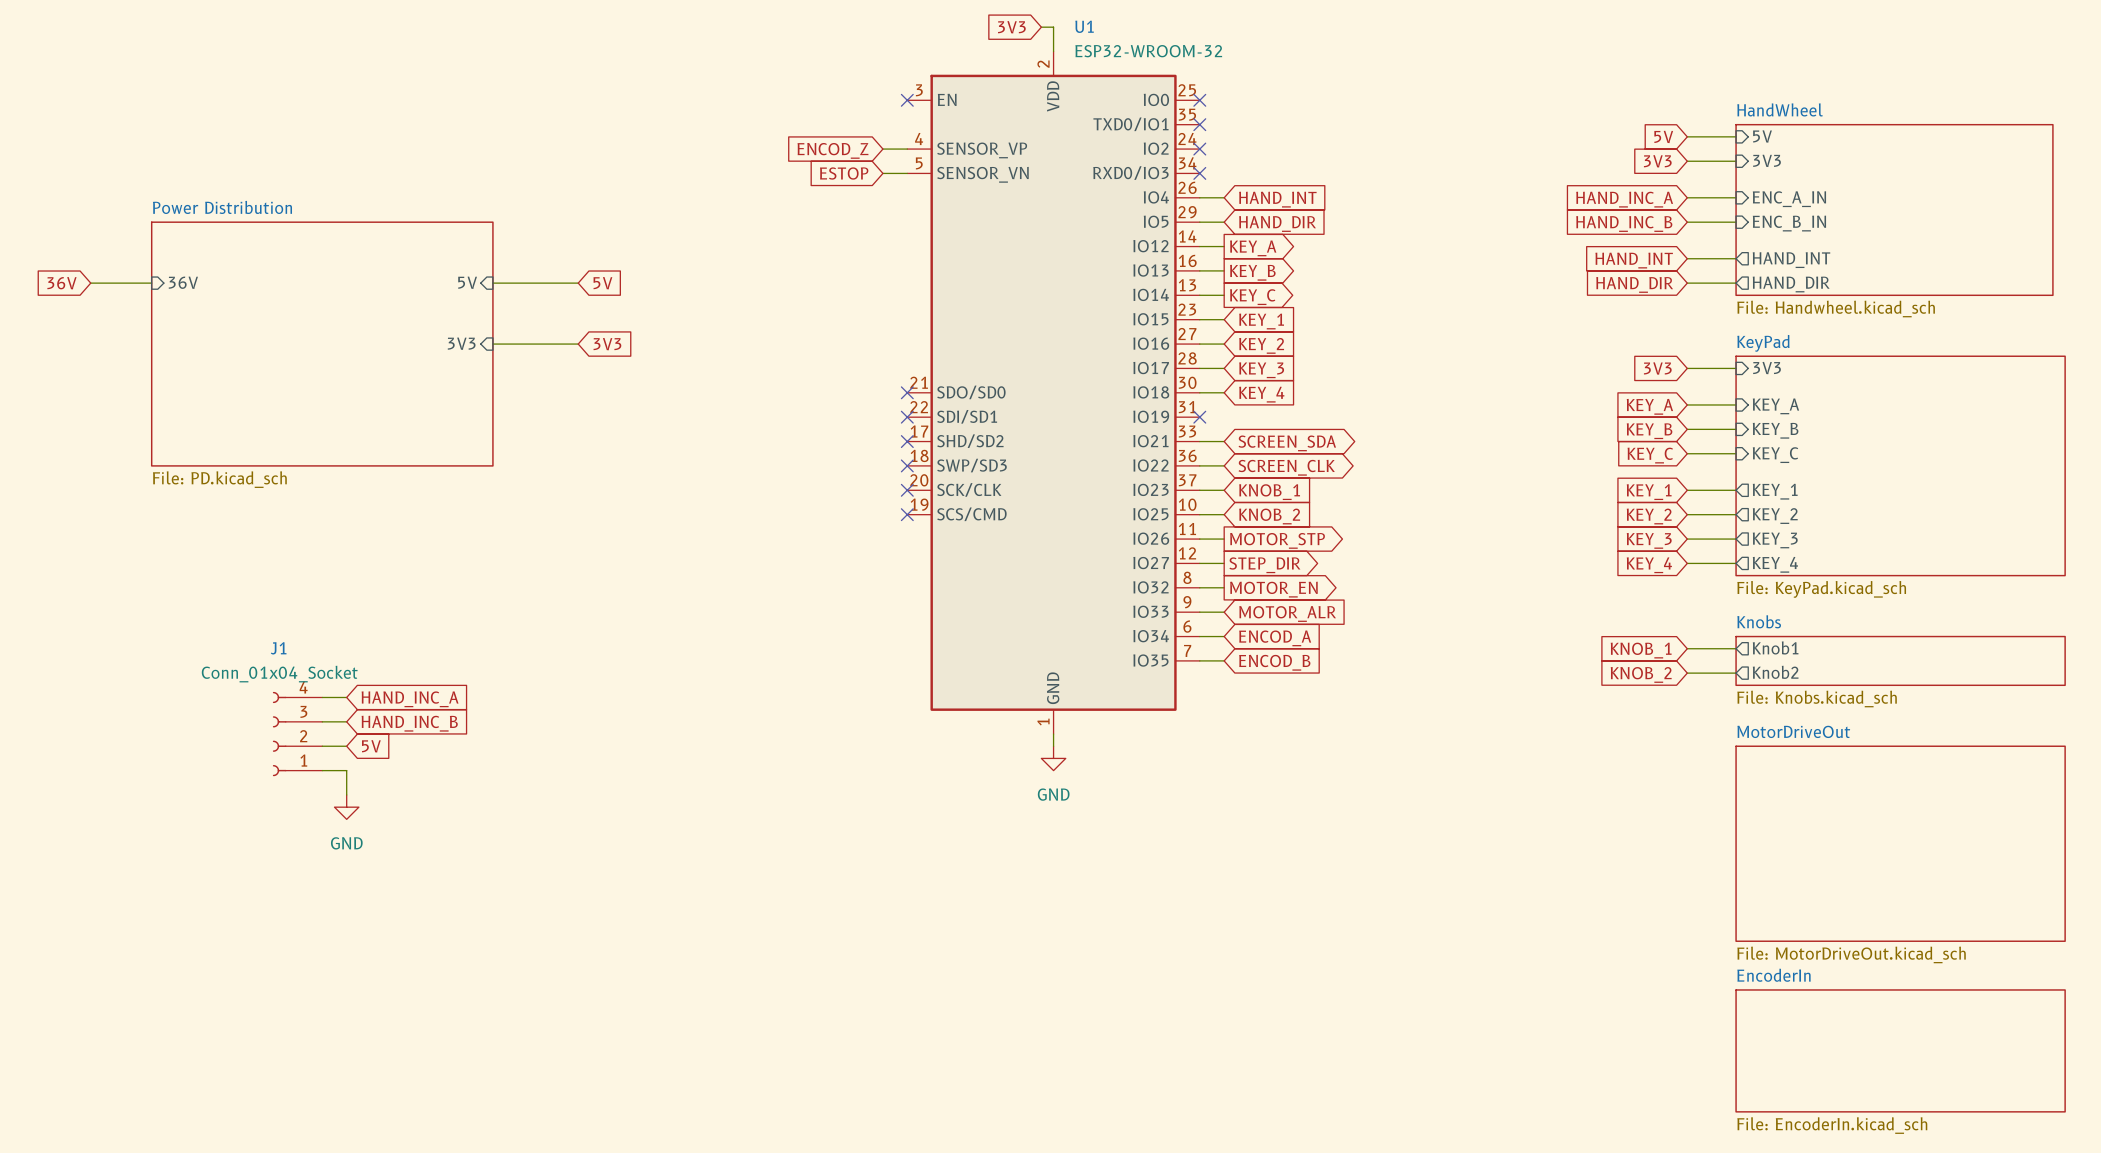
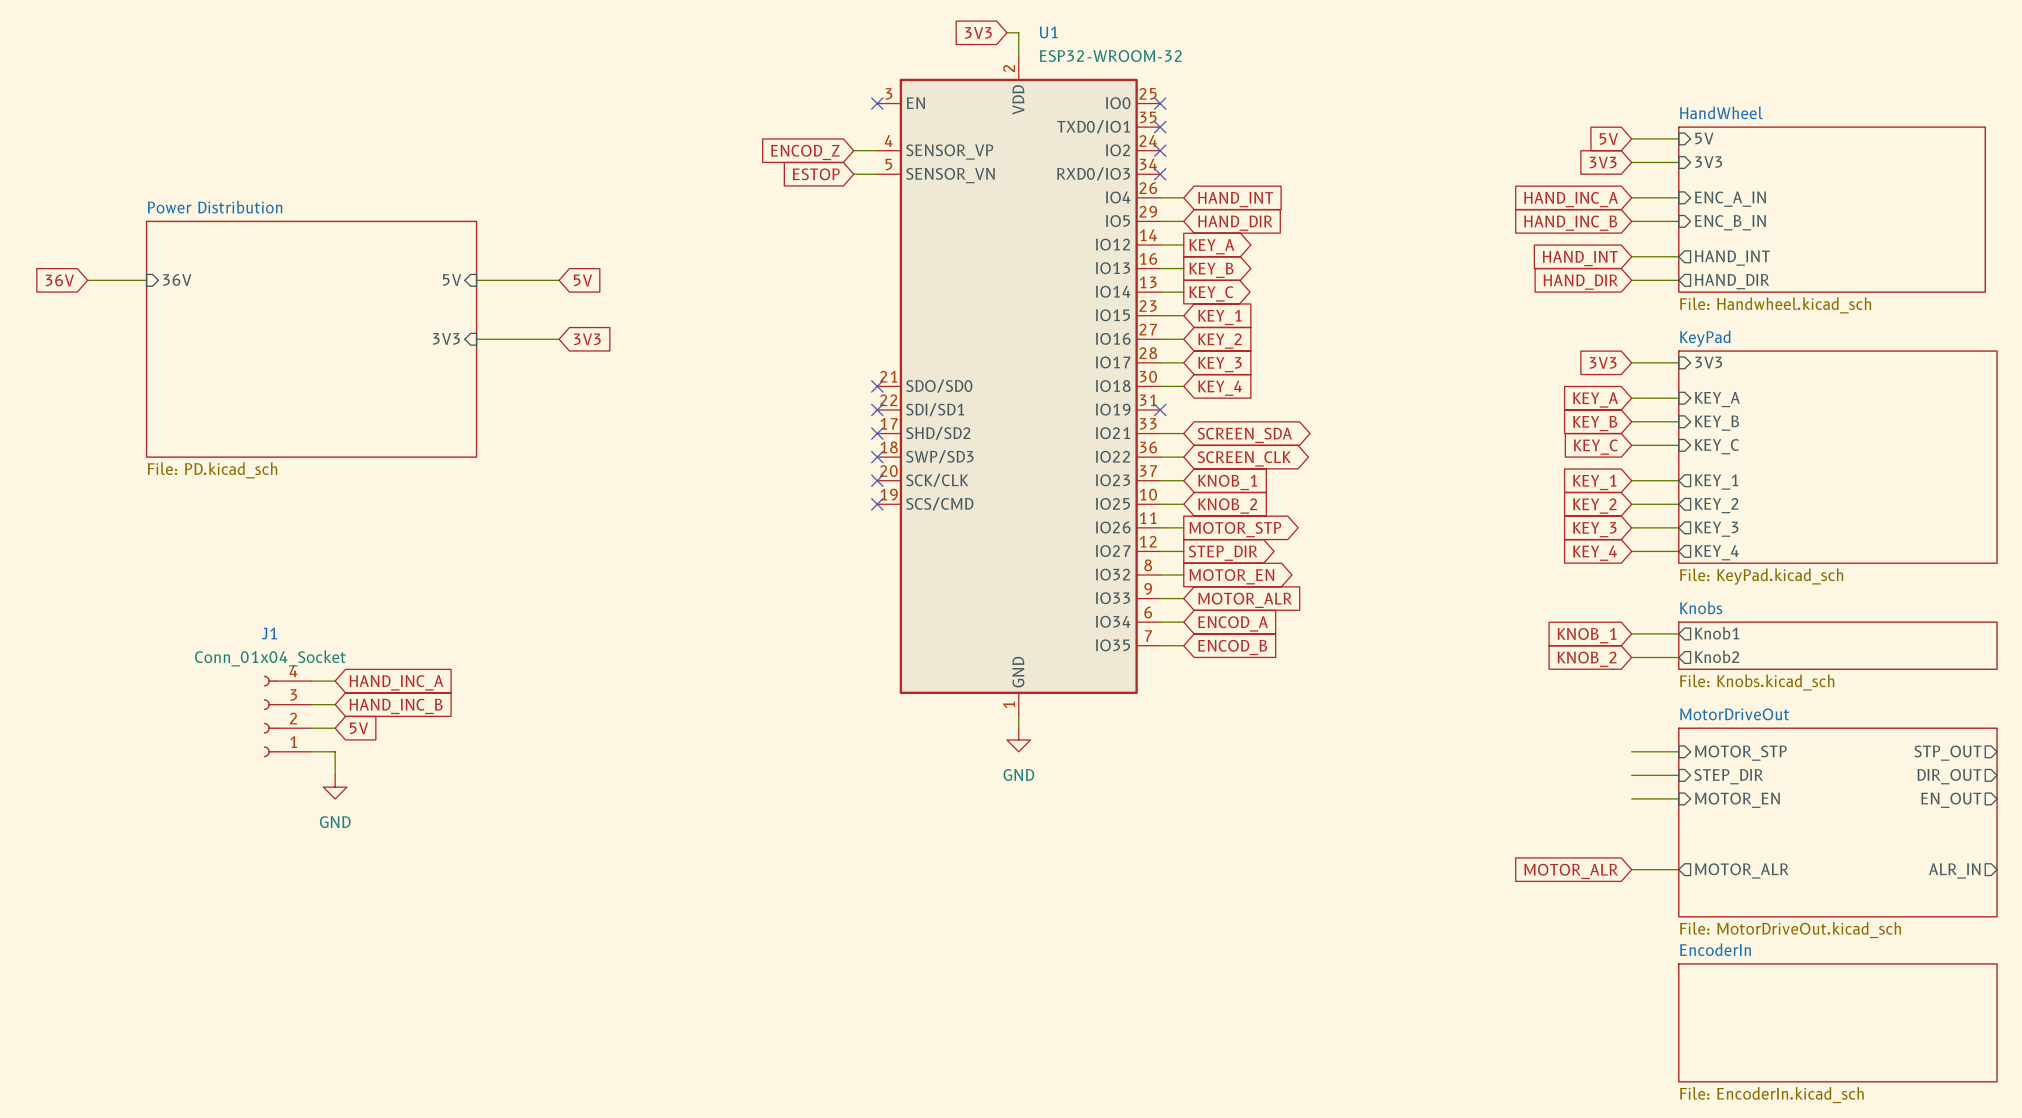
wire: none -> (1631, 751) (1678, 751)
sheet pin: none -> MOTOR_STP (1740, 753)
sheet pin: none -> STP_OUT (1947, 753)
wire: none -> (1631, 775) (1678, 775)
sheet pin: none -> STEP_DIR (1728, 776)
sheet pin: none -> DIR_OUT (1949, 776)
wire: none -> (1631, 798) (1678, 798)
sheet pin: none -> MOTOR_EN (1737, 800)
sheet pin: none -> EN_OUT (1951, 800)
wire: none -> (1631, 869) (1678, 869)
sheet pin: none -> MOTOR_ALR (1741, 870)
sheet pin: none -> ALR_IN (1954, 870)
global label: none -> MOTOR_ALR (1571, 871)

